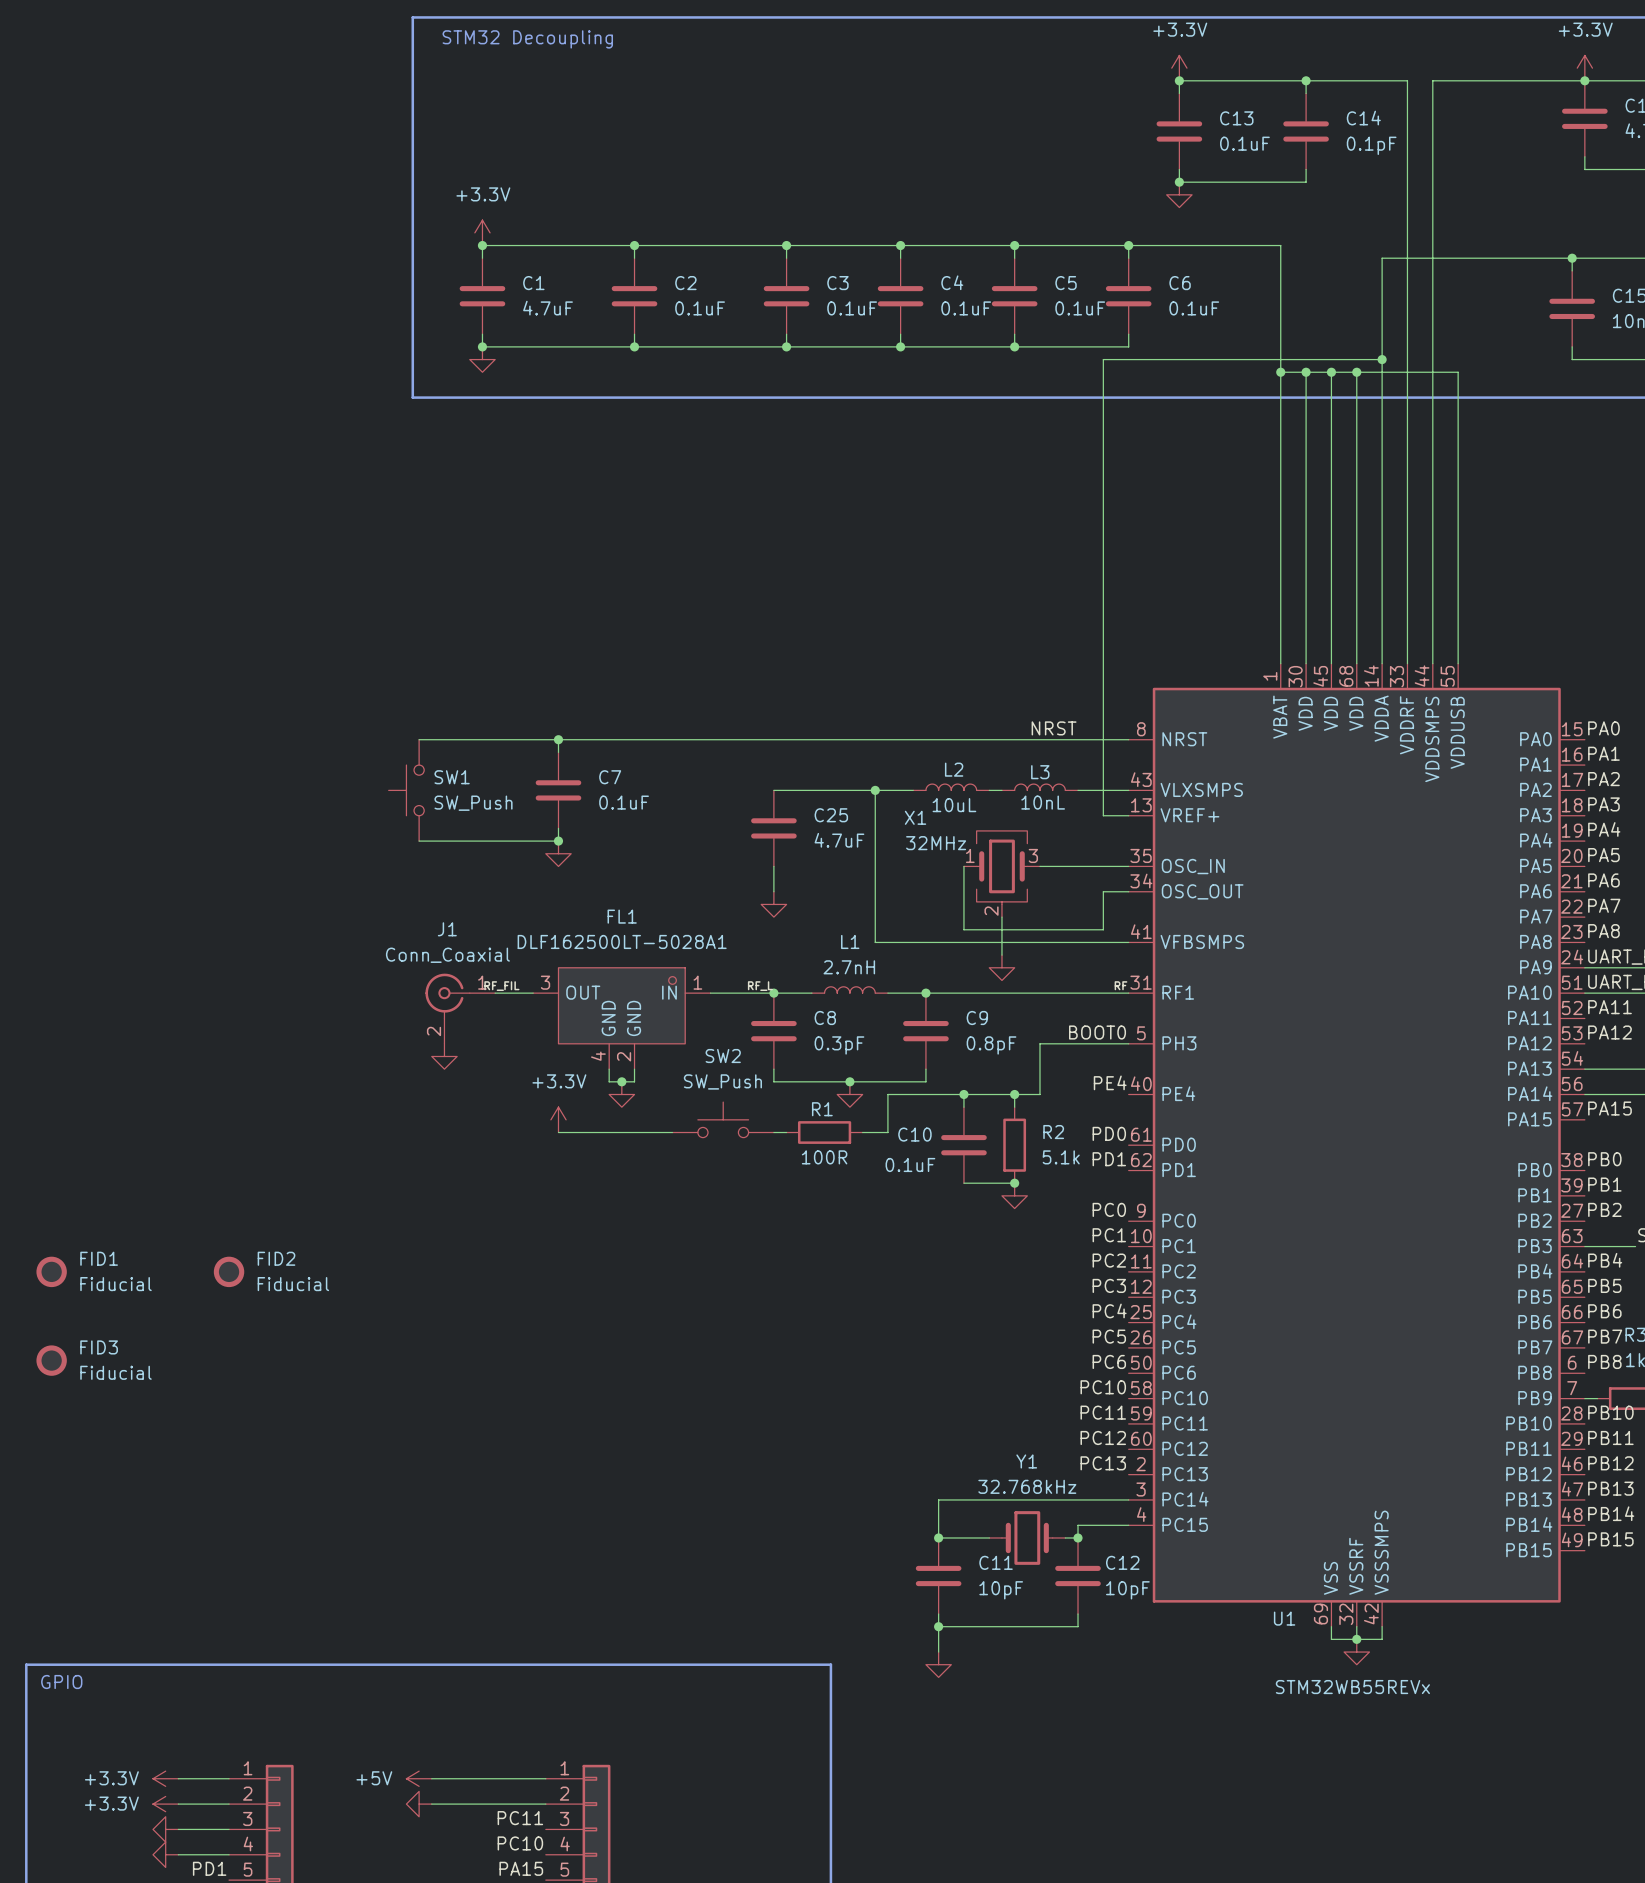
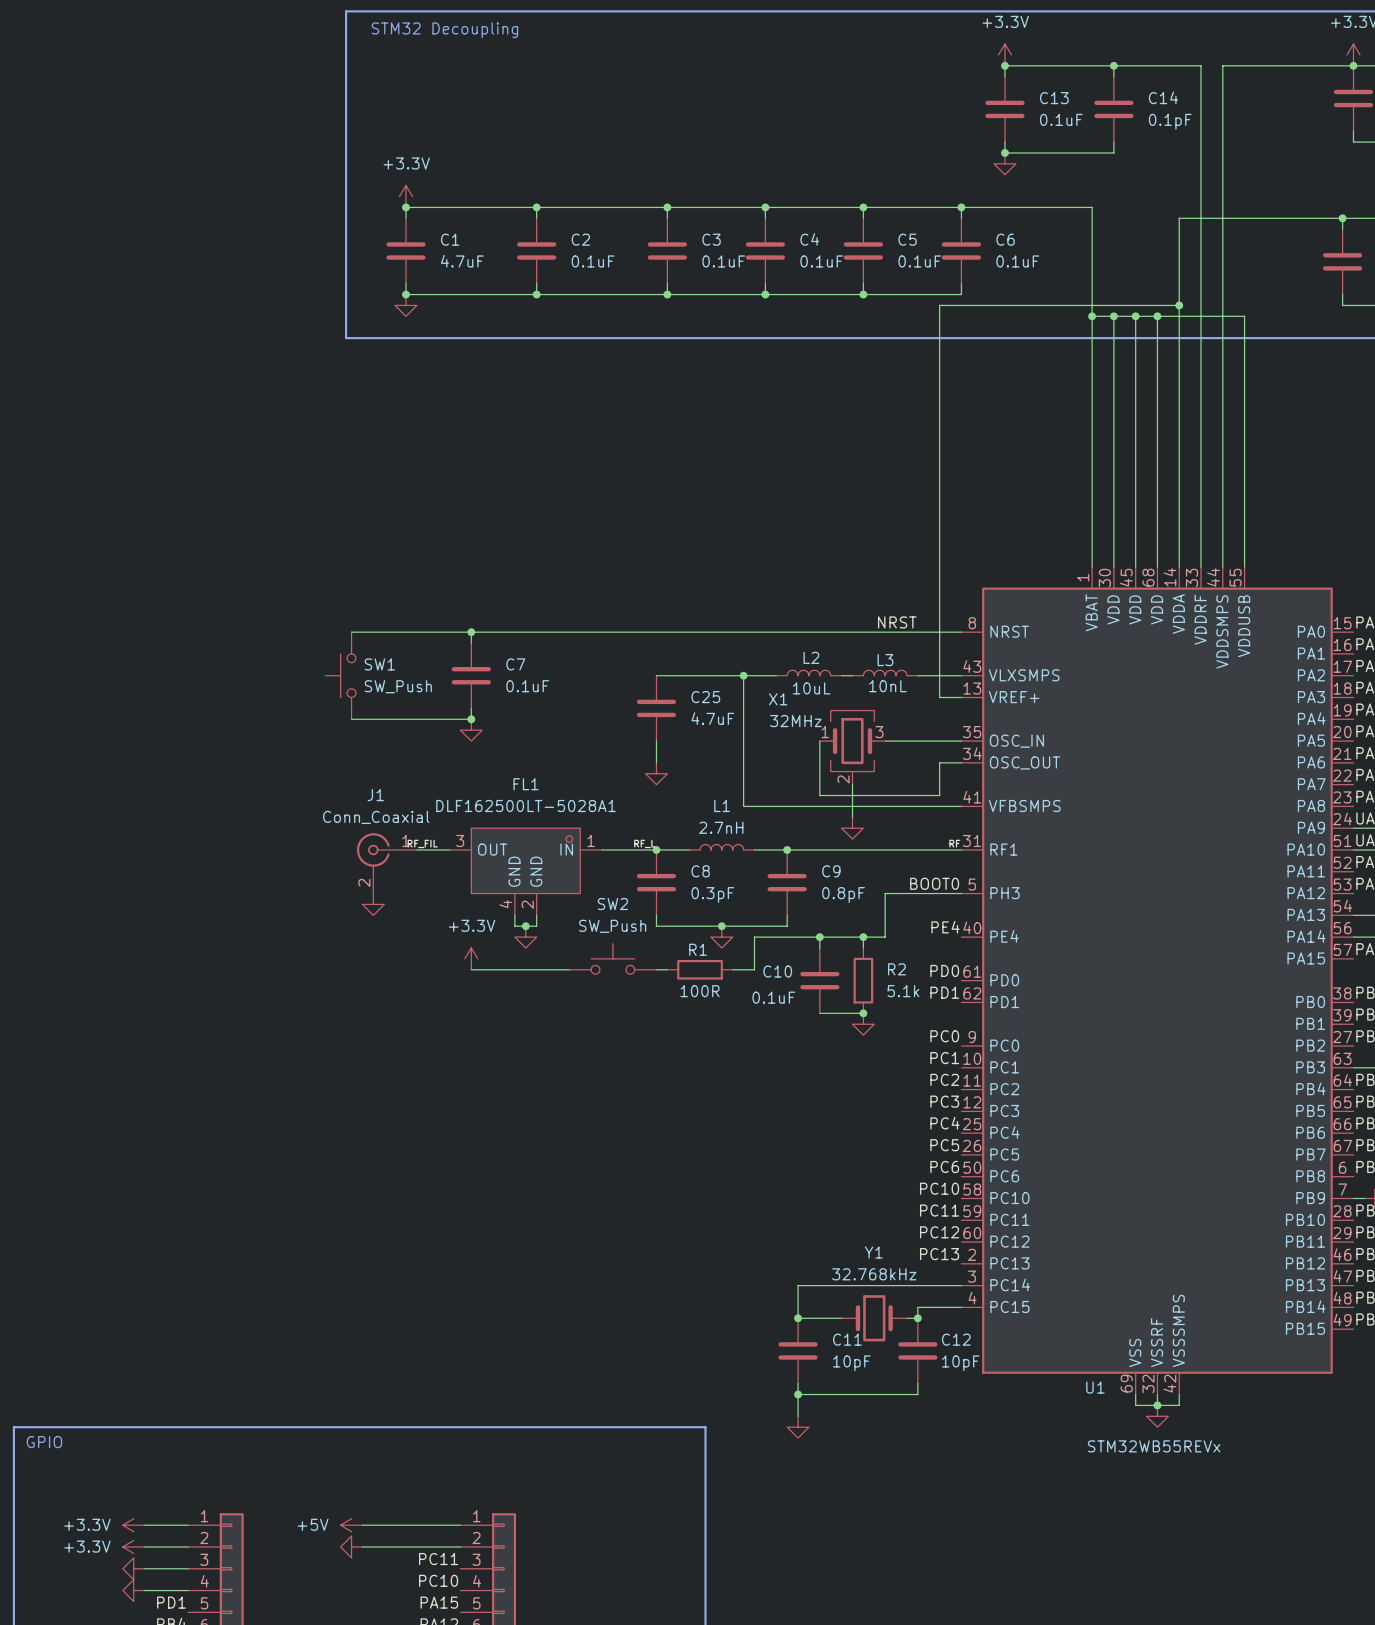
FID1: Fiducial (51, 1271) -> none
FID2: Fiducial (229, 1271) -> none
FID3: Fiducial (51, 1360) -> none

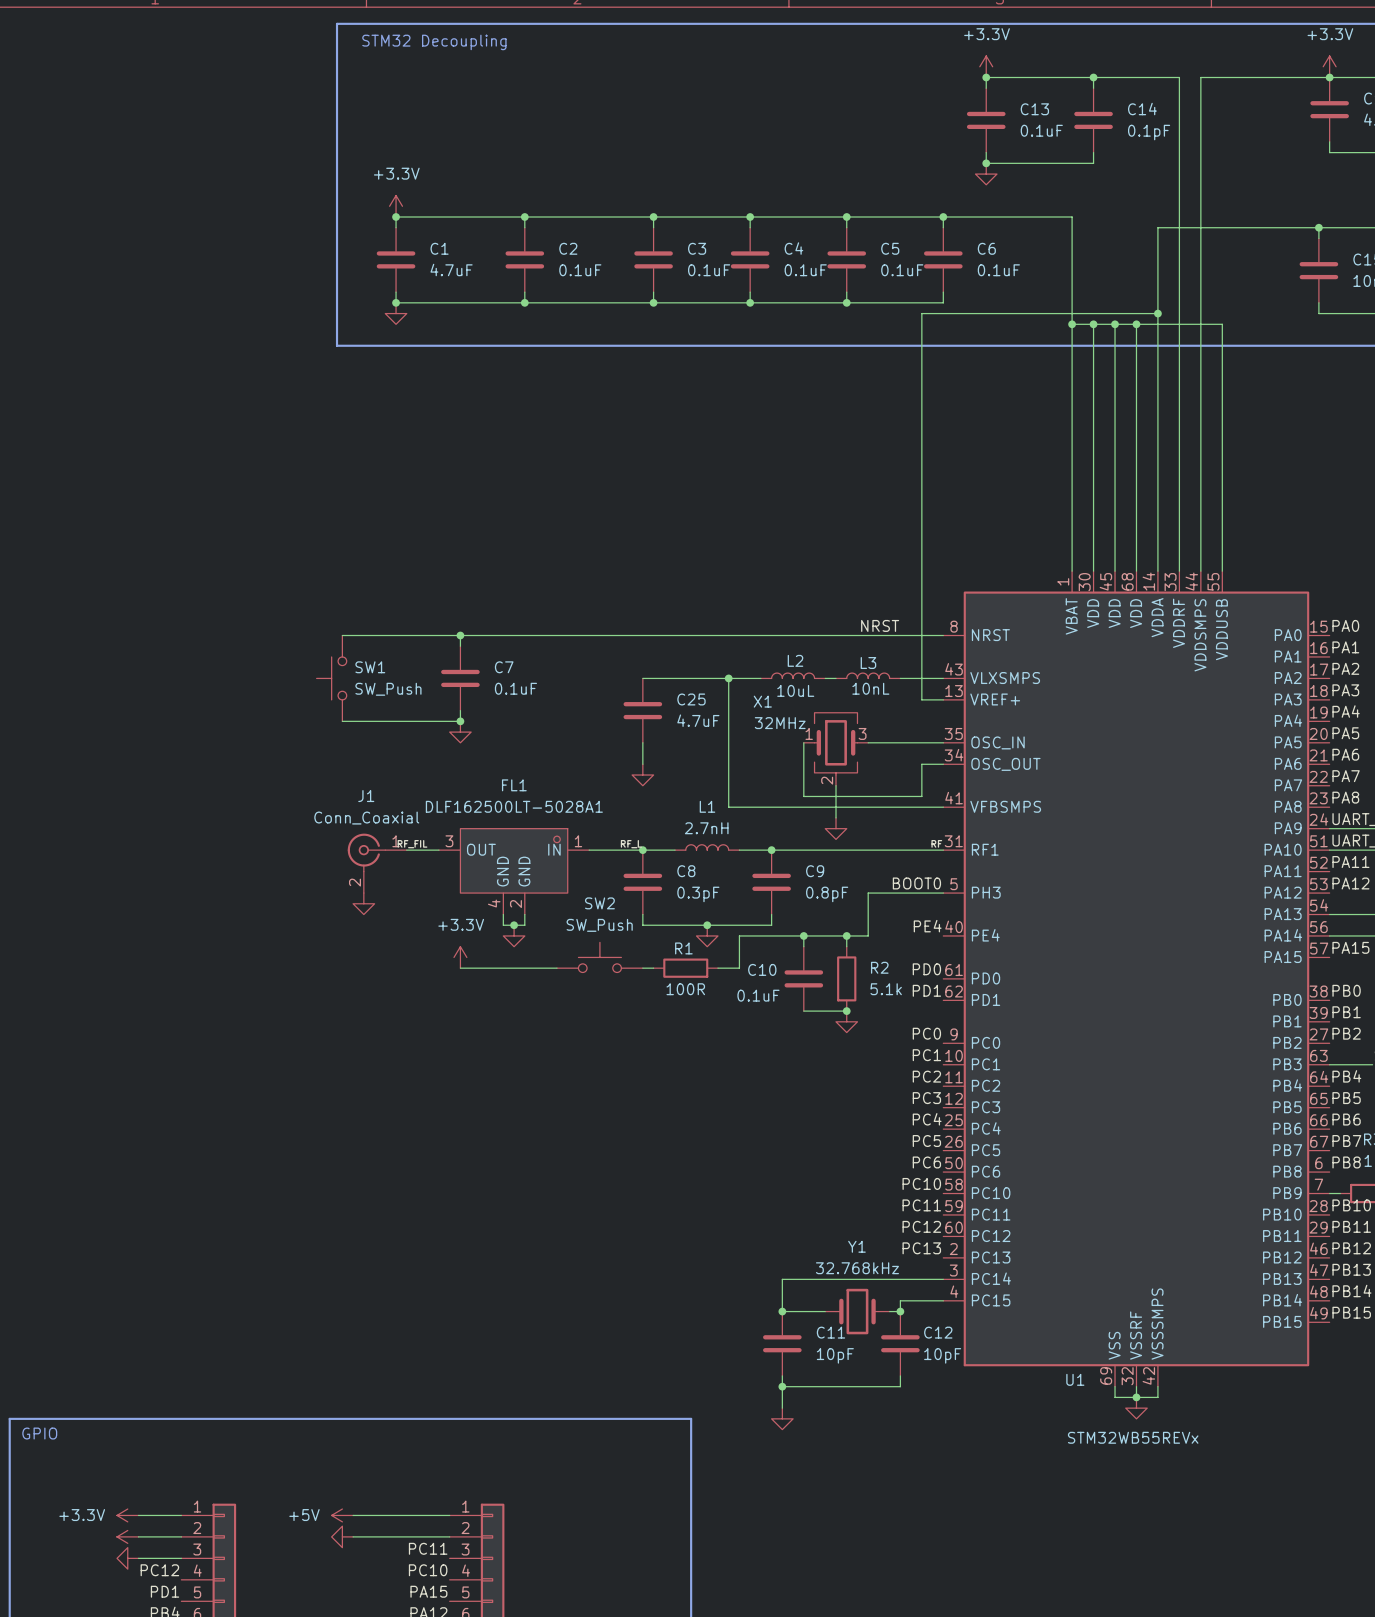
power symbol text: +3.3V (87, 1546) -> none
label: none -> PC12 (159, 1570)
power symbol: (133, 1590) -> none
wire: (144, 1590) (188, 1590) -> none

